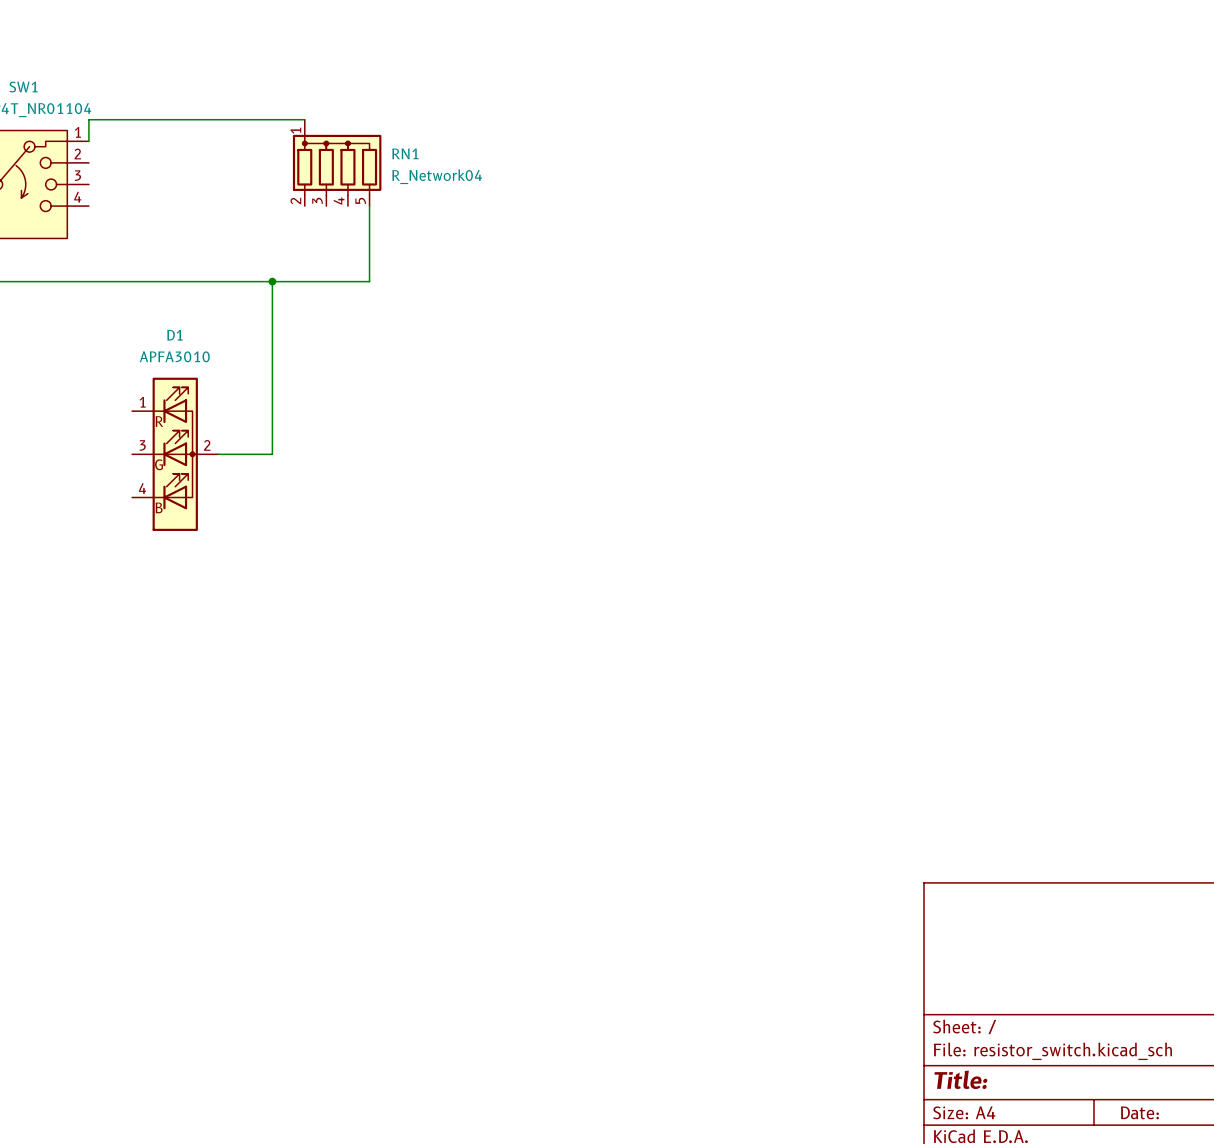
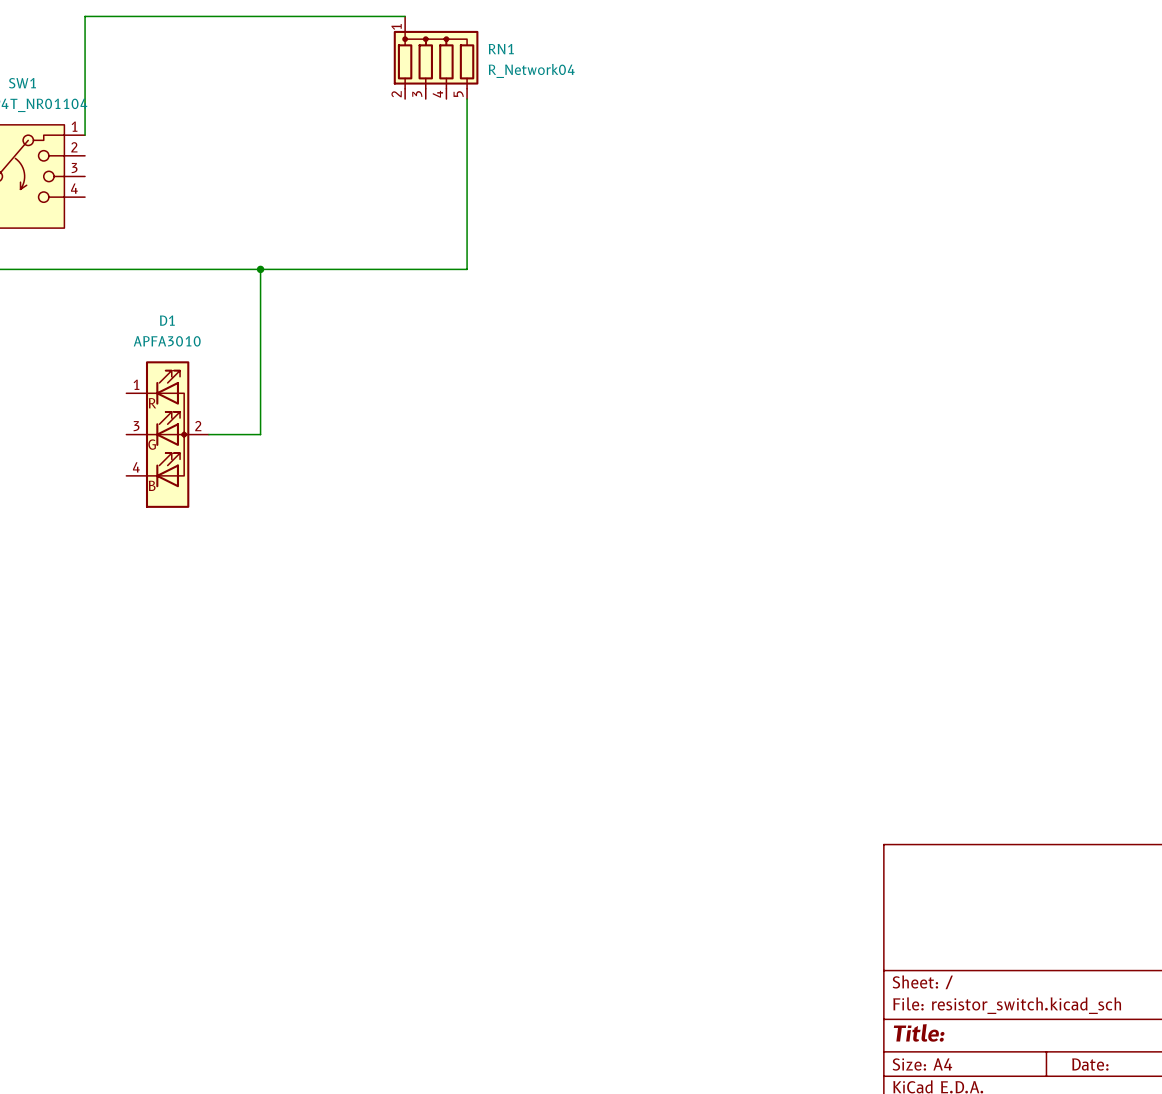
wire: (88, 119) (304, 119) -> (85, 114) (85, 16) (405, 16)
RN1 position: (337, 162) -> (436, 57)
wire: (369, 206) (369, 281) -> (467, 99) (467, 269) (353, 269)

